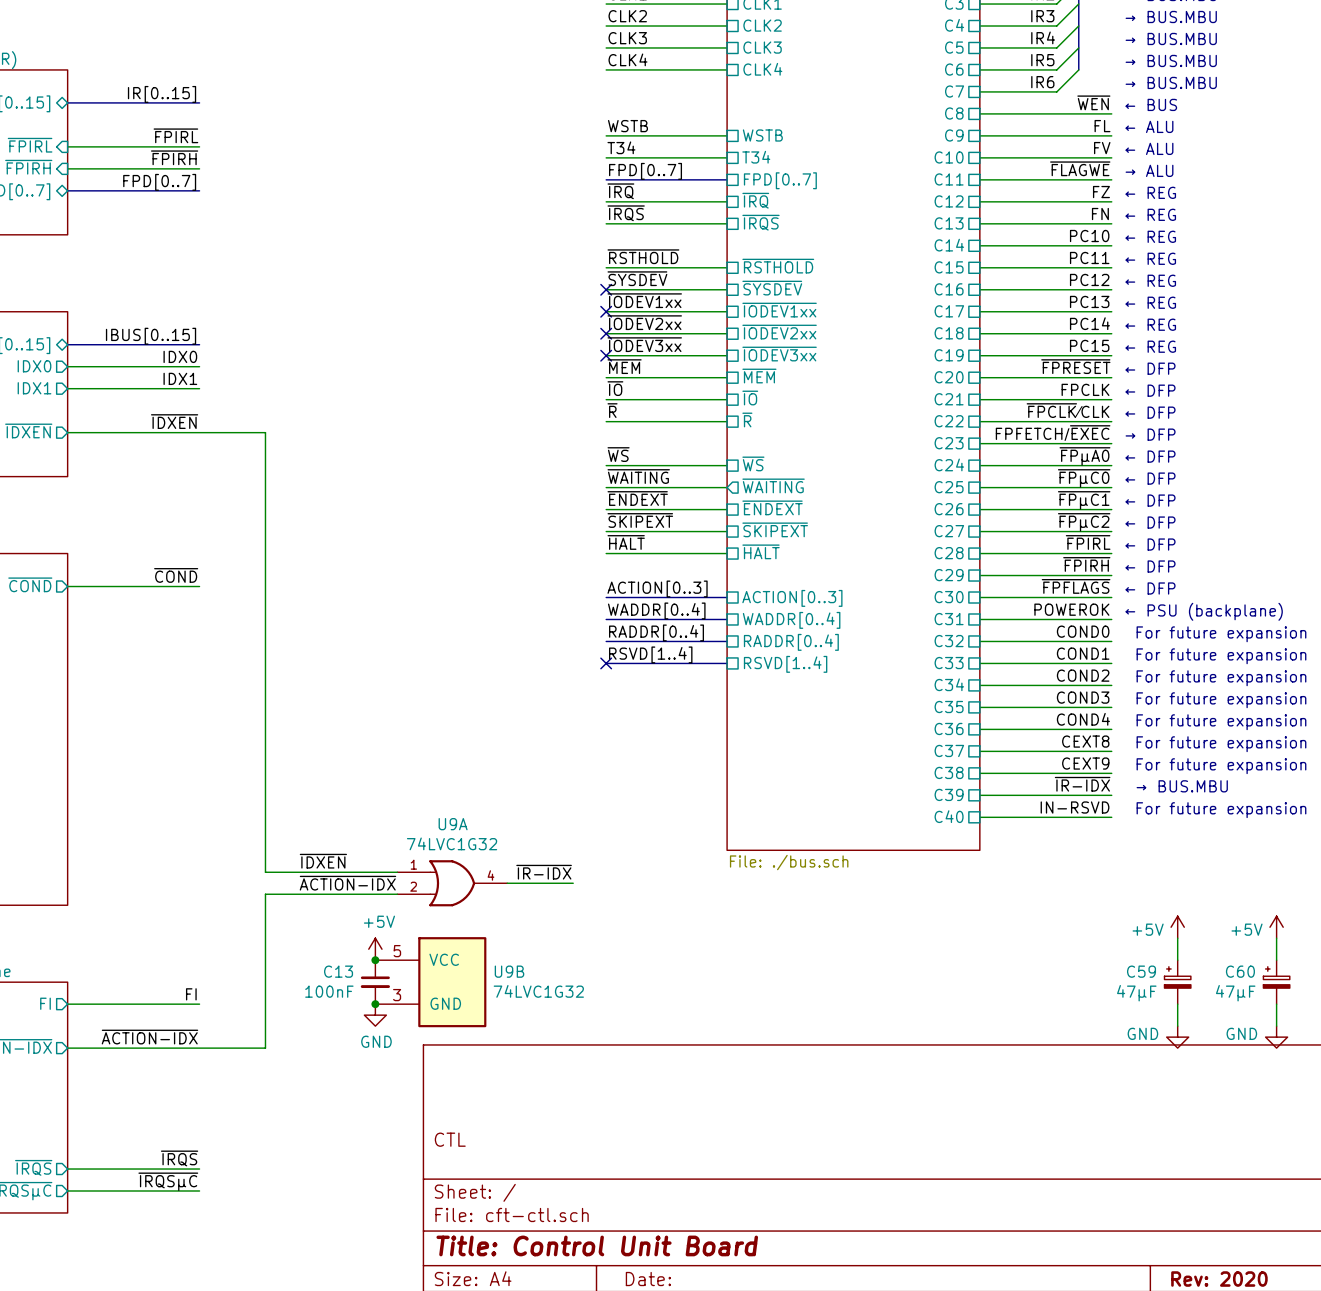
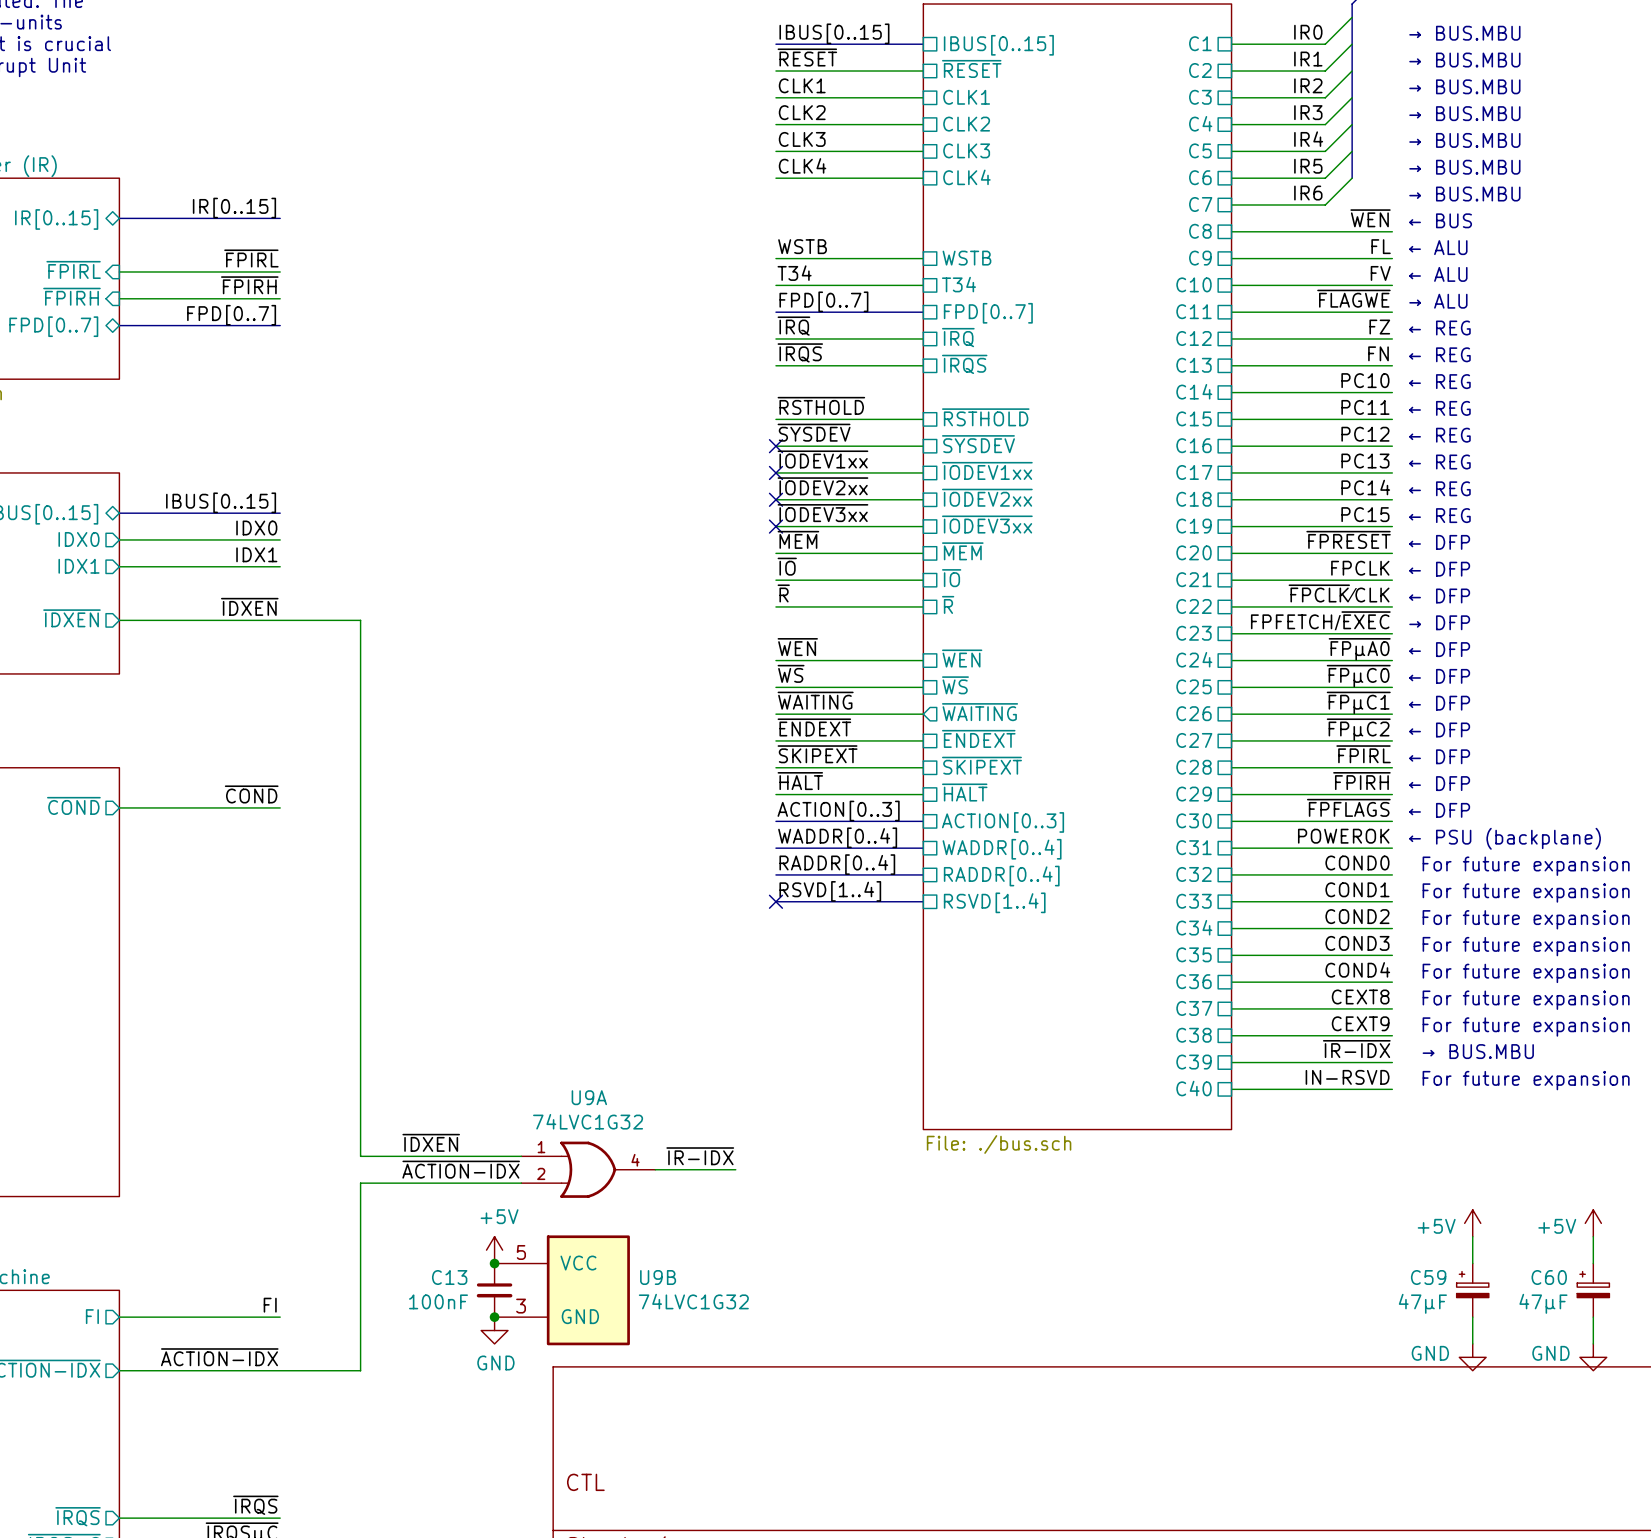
label: ~{WS} (618, 454) -> ~{WEN} (797, 647)
sheet pin: ~{WS} (753, 463) -> ~{WEN} (962, 658)
label: ~{WAITING} (638, 476) -> ~{WS} (791, 673)
sheet pin shape: output (773, 485) -> passive (955, 685)
sheet pin: ~{WAITING} (773, 485) -> ~{WS} (955, 685)
label: ~{ENDEXT} (637, 498) -> ~{WAITING} (815, 700)
sheet pin shape: passive (772, 507) -> output (980, 712)
sheet pin: ~{ENDEXT} (772, 507) -> ~{WAITING} (980, 712)
label: ~{SKIPEXT} (640, 520) -> ~{ENDEXT} (814, 727)
sheet pin: ~{SKIPEXT} (775, 529) -> ~{ENDEXT} (978, 738)
label: ~{HALT} (626, 542) -> ~{SKIPEXT} (817, 754)
sheet pin: ~{HALT} (761, 551) -> ~{SKIPEXT} (981, 765)
label: none -> ~{HALT} (800, 781)
sheet pin: none -> ~{HALT} (964, 792)
wire: none -> (775, 794) (923, 794)

